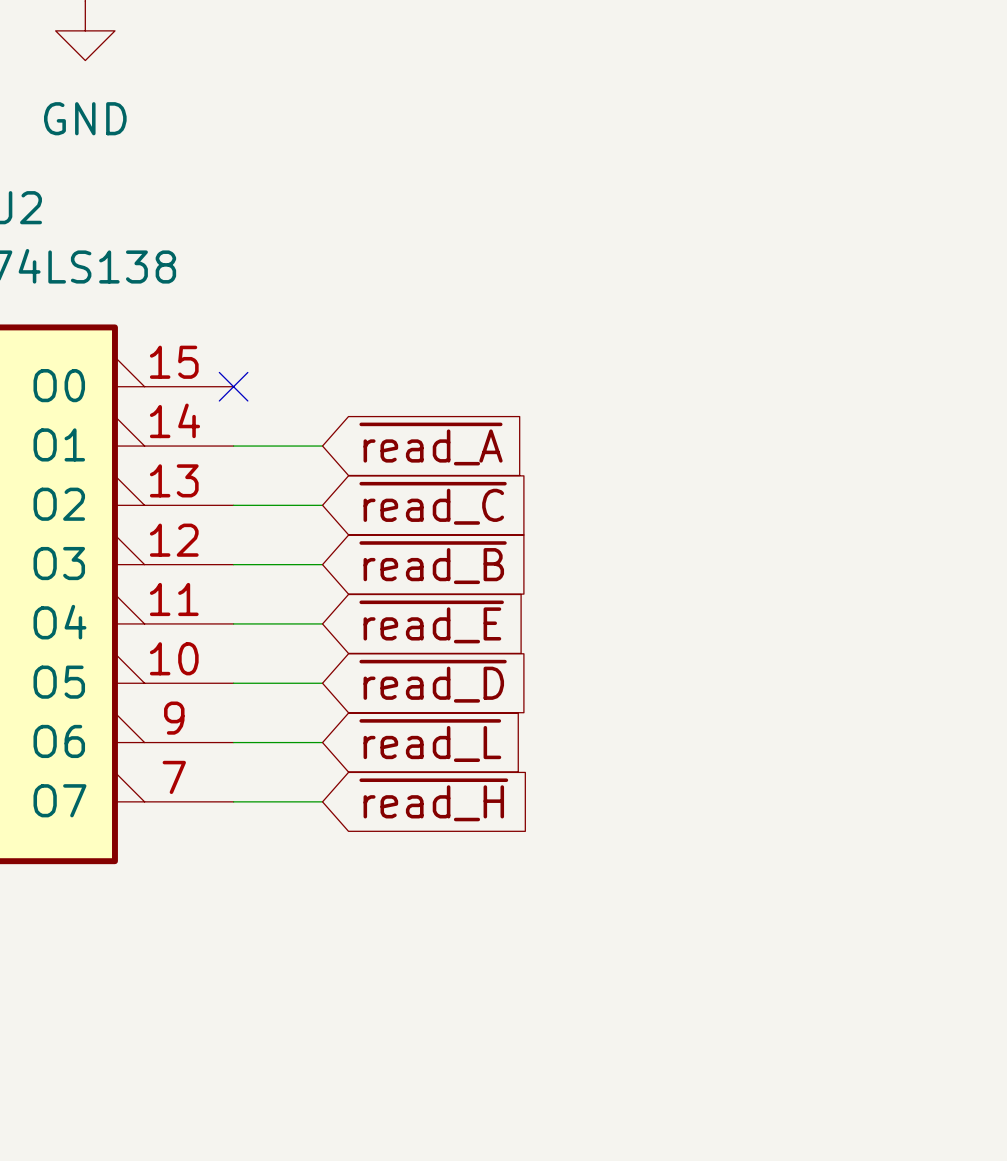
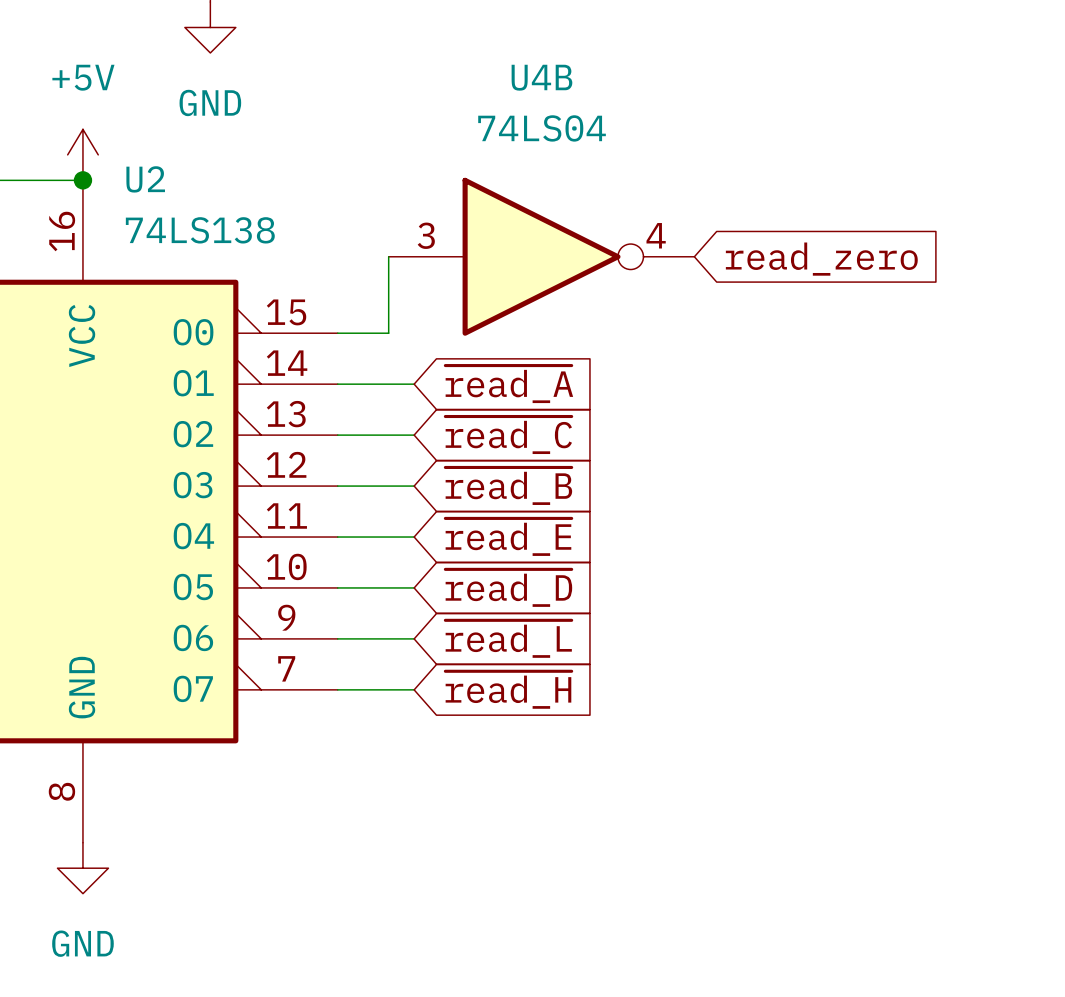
wire: none -> (388, 256) (388, 333) (337, 333)
U4B: none -> 74LS04 (541, 256)
global label: none -> read_zero (821, 259)
no-connect mark: (233, 386) -> none

